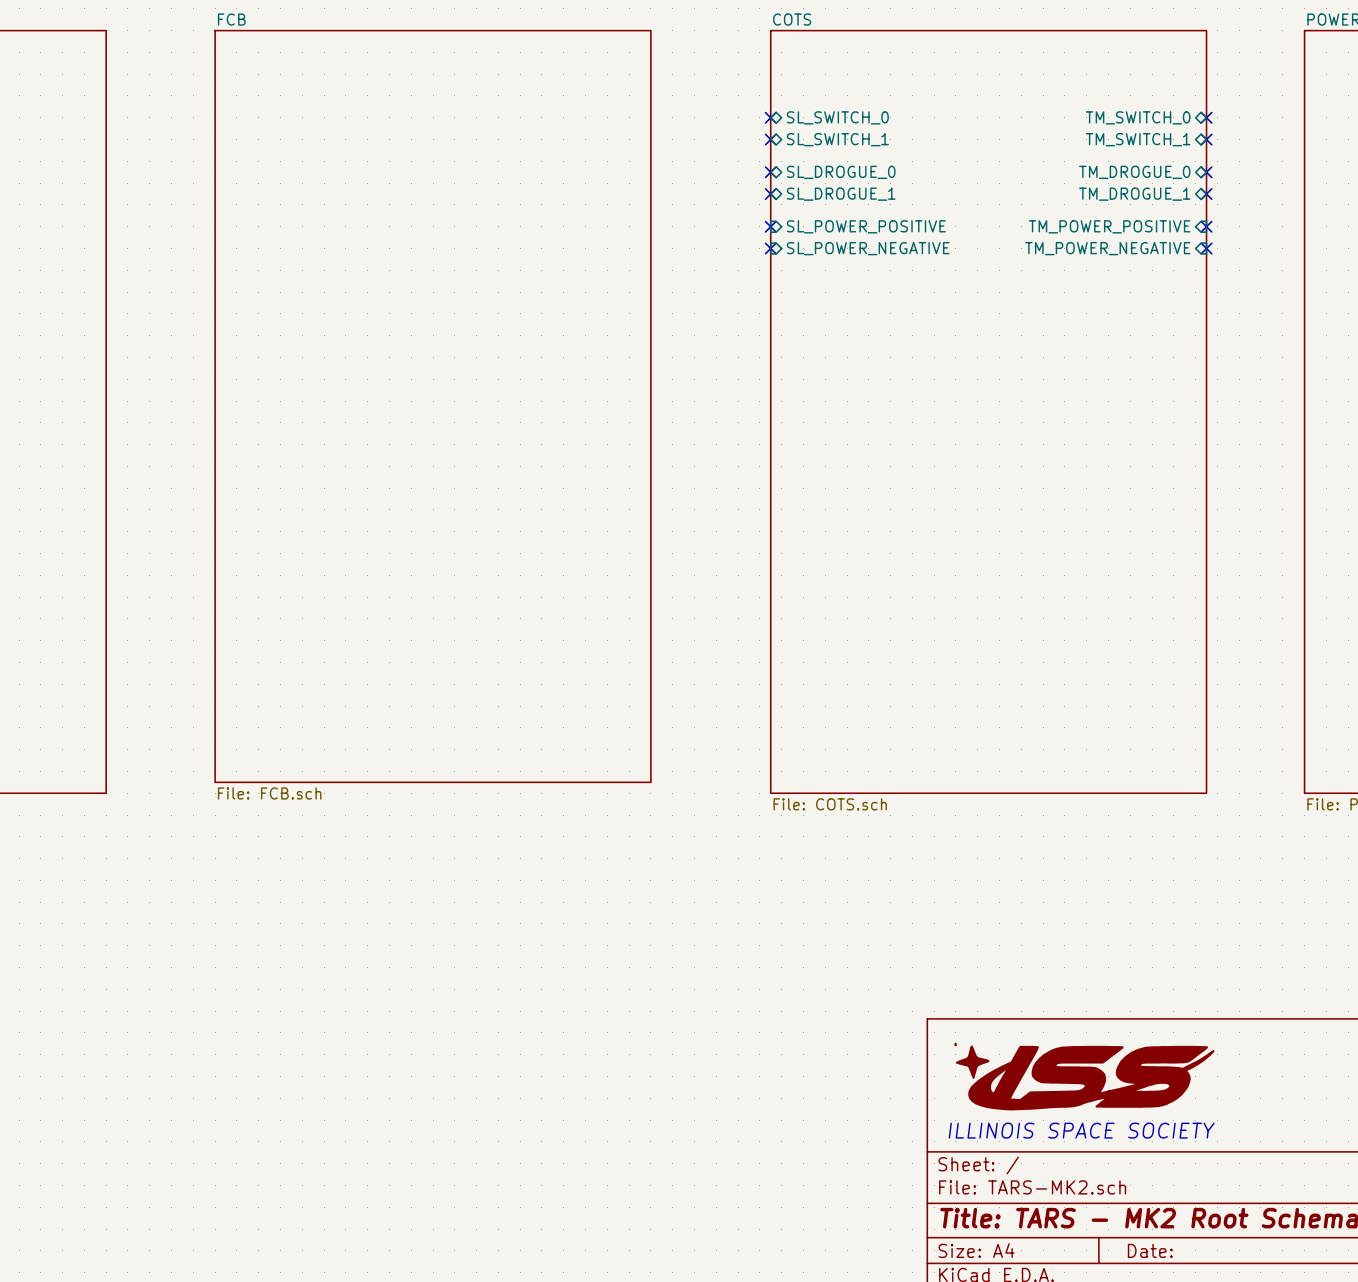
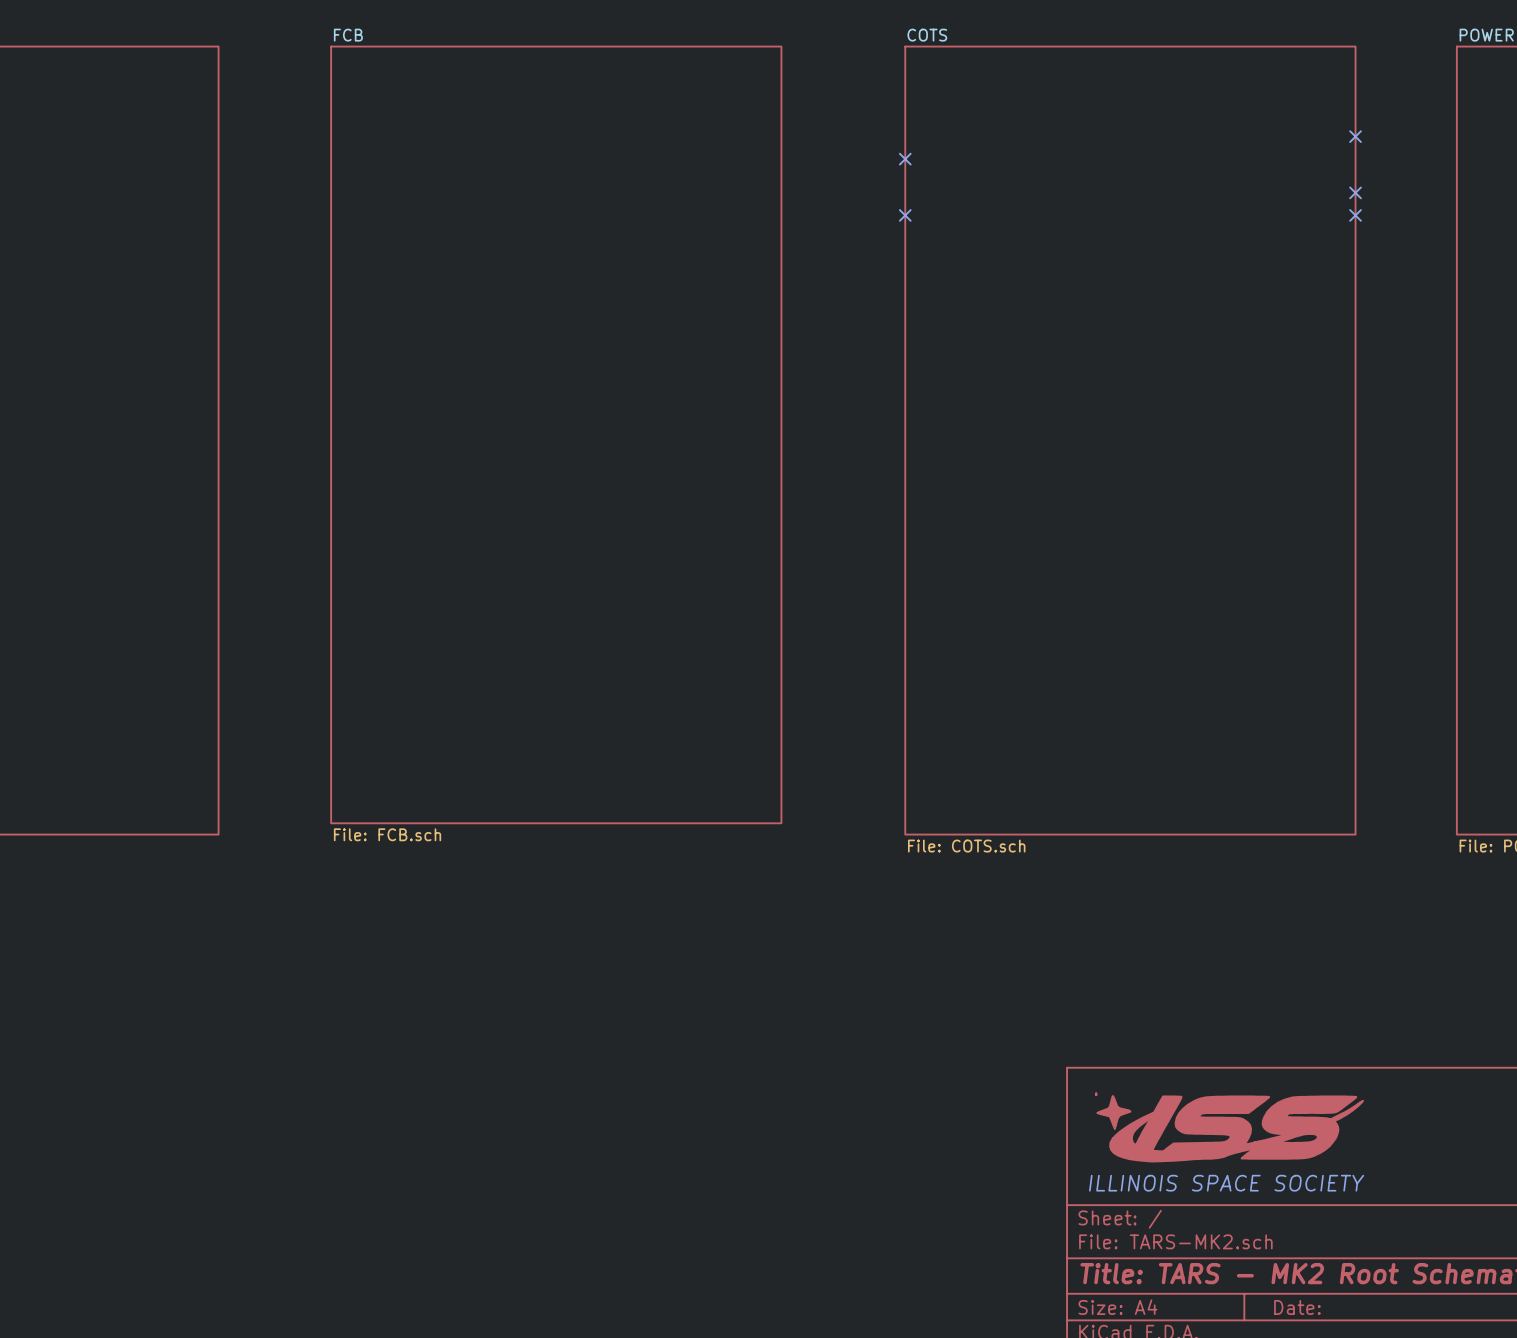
no-connect mark: (770, 117) -> none
sheet pin: SL_SWITCH_0 (837, 117) -> none
sheet pin: TM_SWITCH_0 (1138, 117) -> none
sheet pin: SL_SWITCH_1 (837, 139) -> none
sheet pin: TM_SWITCH_1 (1138, 139) -> none
no-connect mark: (1206, 139) -> none
no-connect mark: (770, 172) -> none
sheet pin: SL_DROGUE_0 (841, 172) -> none
sheet pin: TM_DROGUE_0 (1134, 172) -> none
sheet pin: SL_DROGUE_1 (841, 194) -> none
sheet pin: TM_DROGUE_1 (1134, 194) -> none
no-connect mark: (770, 226) -> none
sheet pin: SL_POWER_POSITIVE (866, 226) -> none
sheet pin: TM_POWER_POSITIVE (1109, 226) -> none
no-connect mark: (1206, 226) -> none
no-connect mark: (770, 248) -> none
sheet pin: SL_POWER_NEGATIVE (868, 248) -> none
sheet pin: TM_POWER_NEGATIVE (1107, 248) -> none
no-connect mark: (1206, 248) -> none

